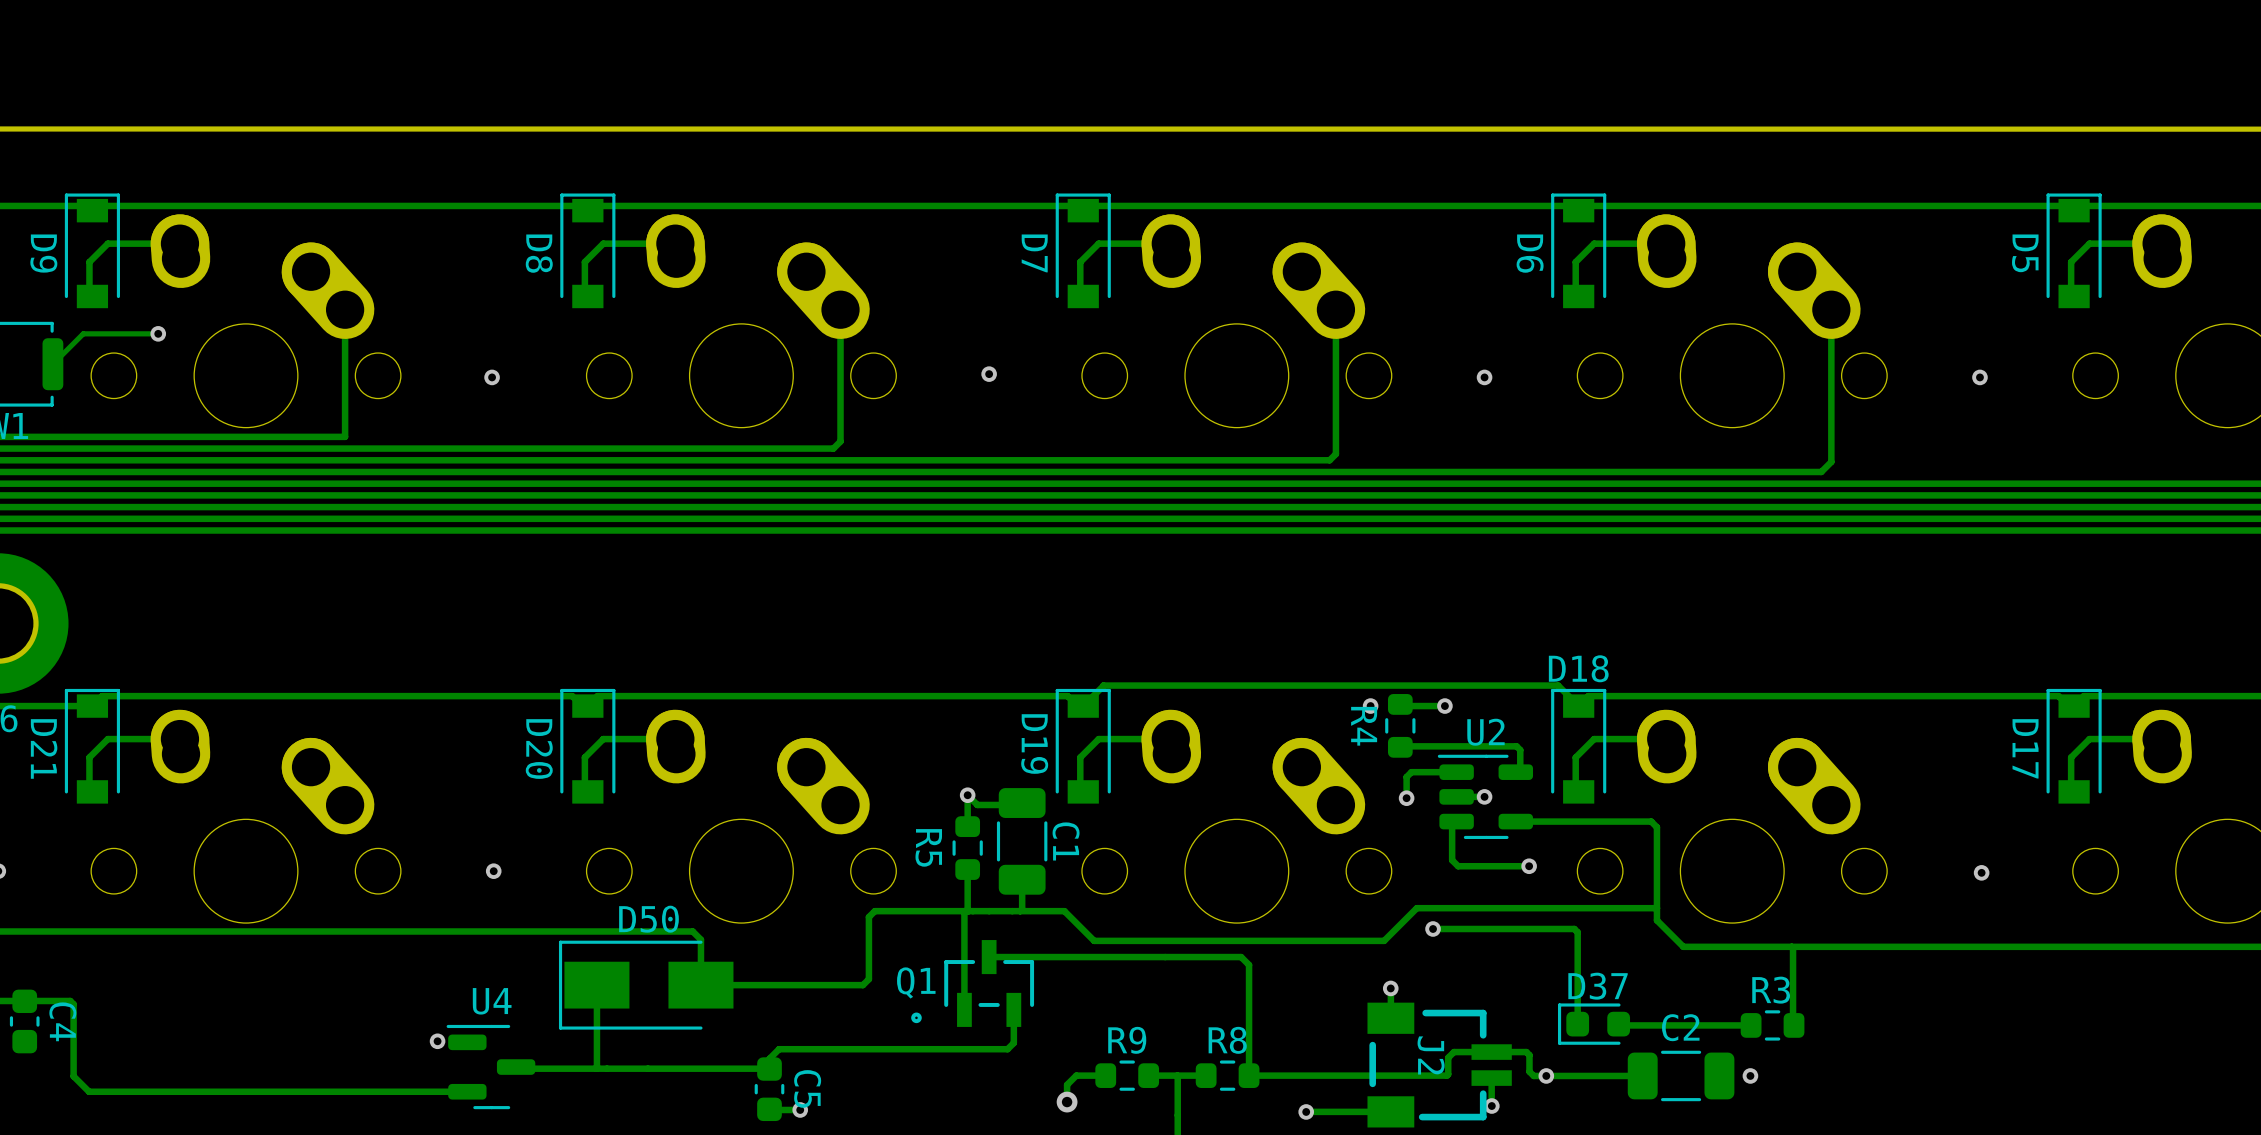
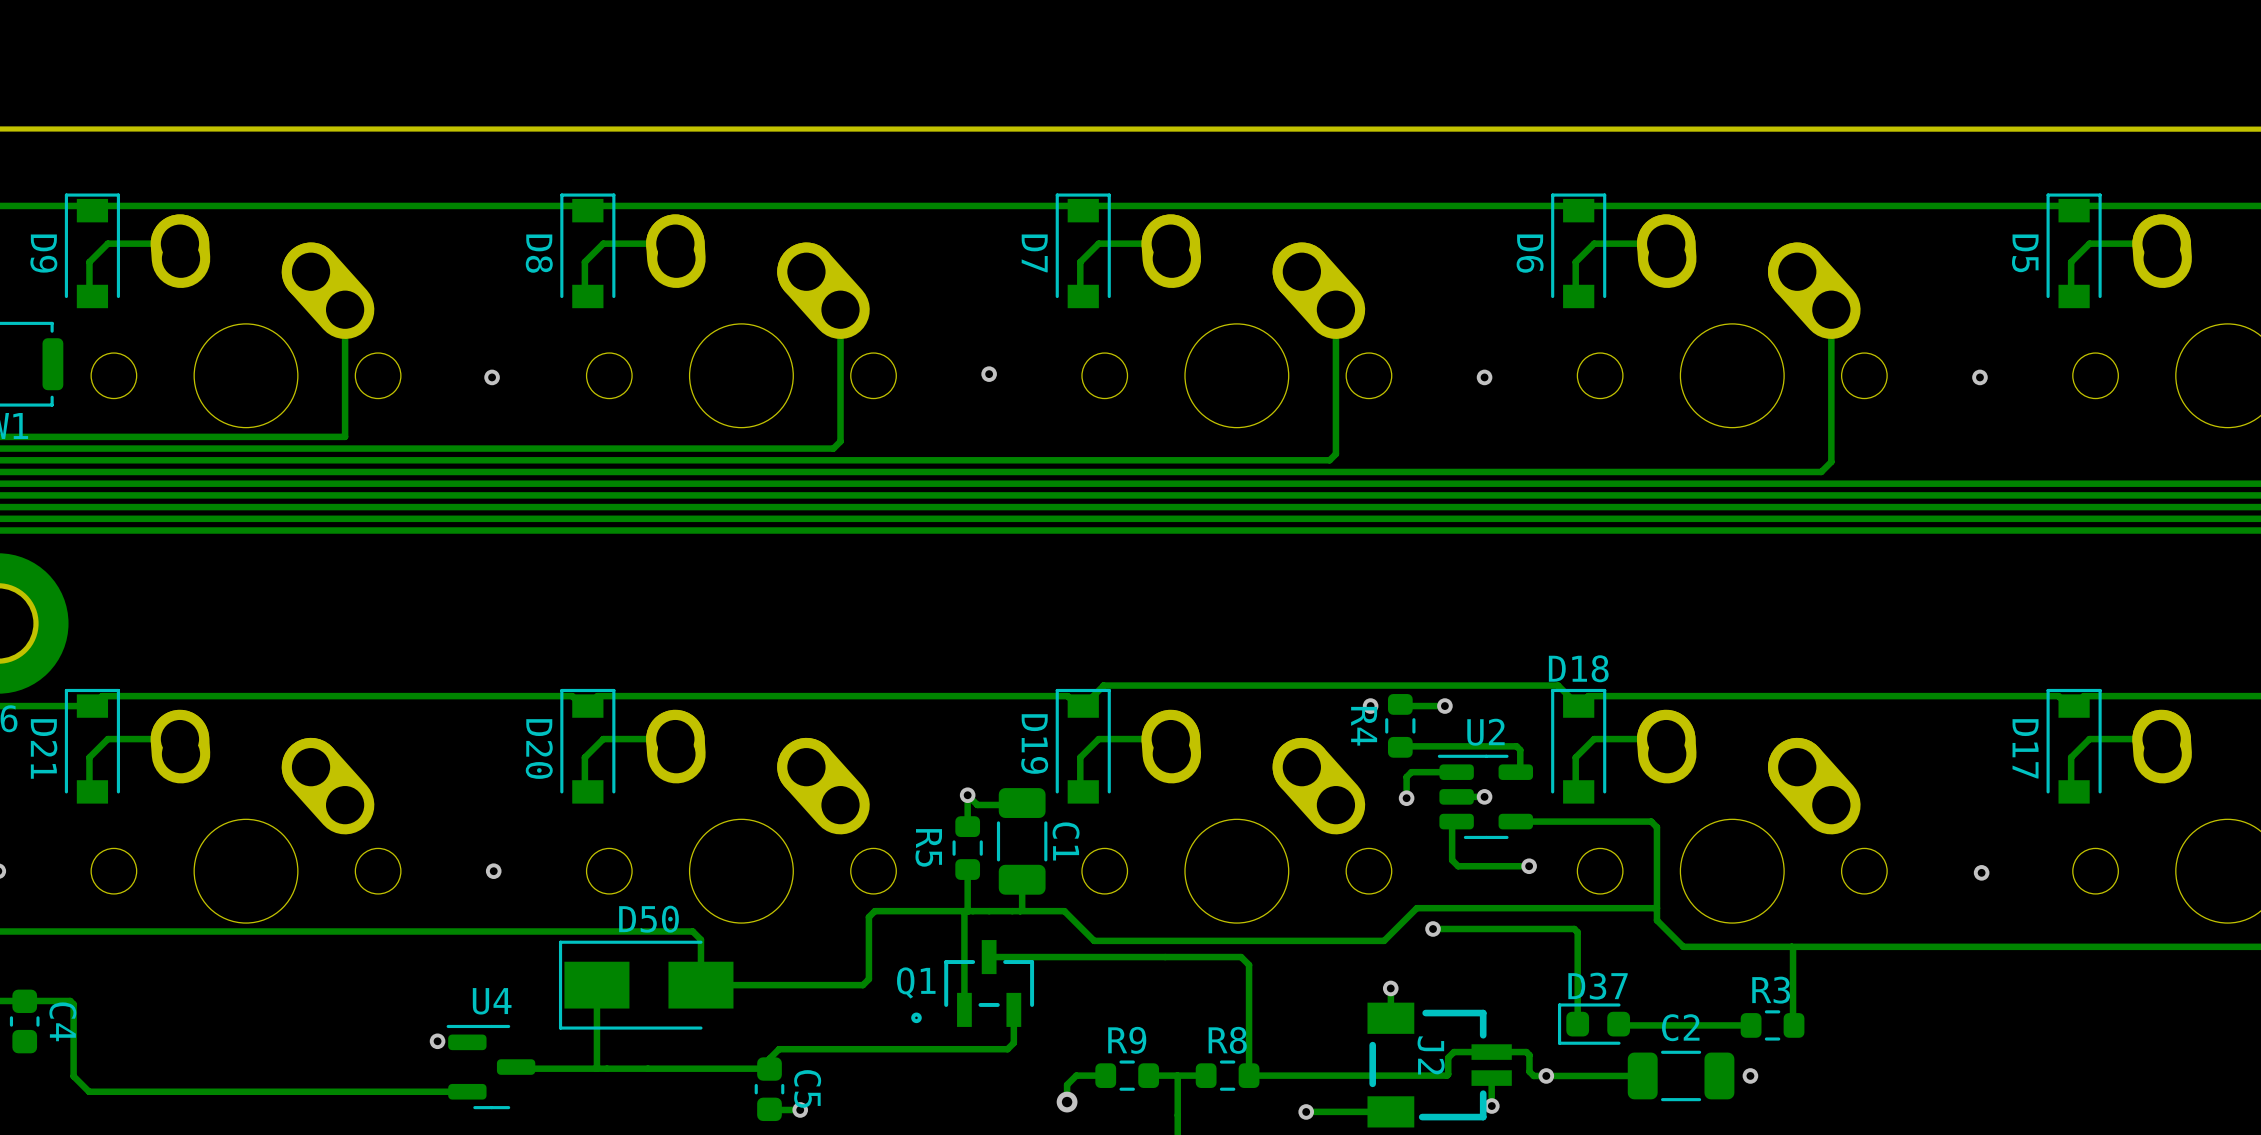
track: (158, 333) (83, 333) (52, 364) -> none
via: (158, 333) -> none

